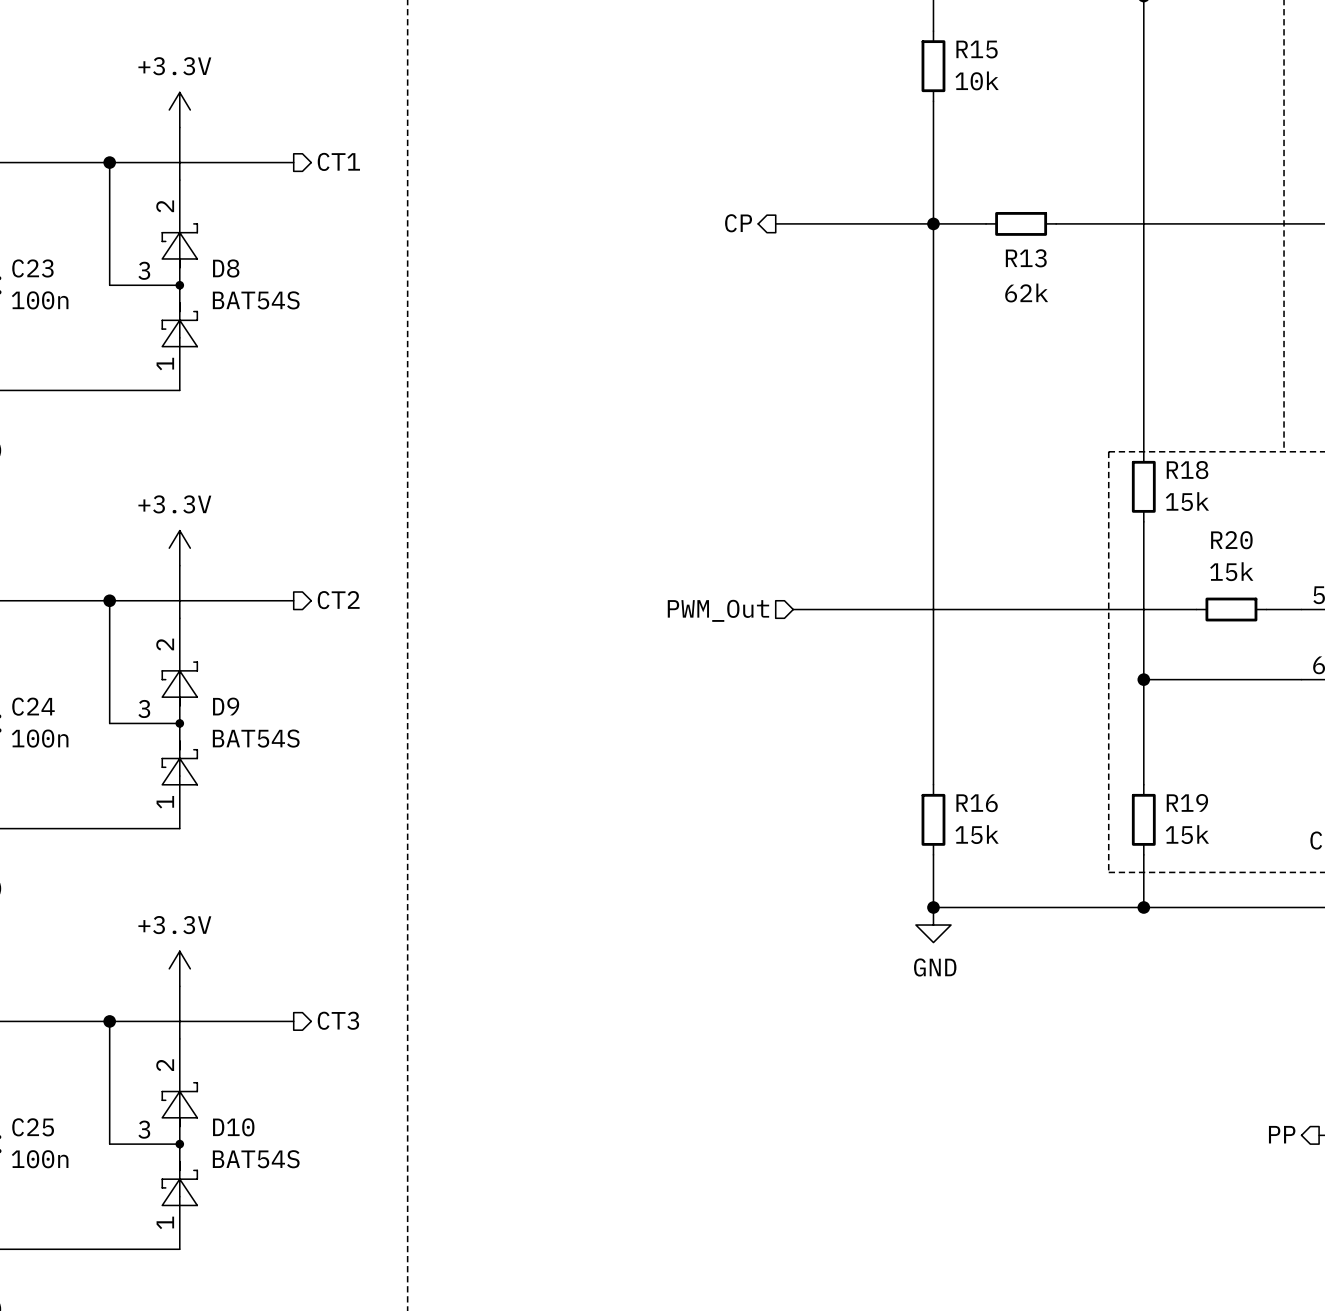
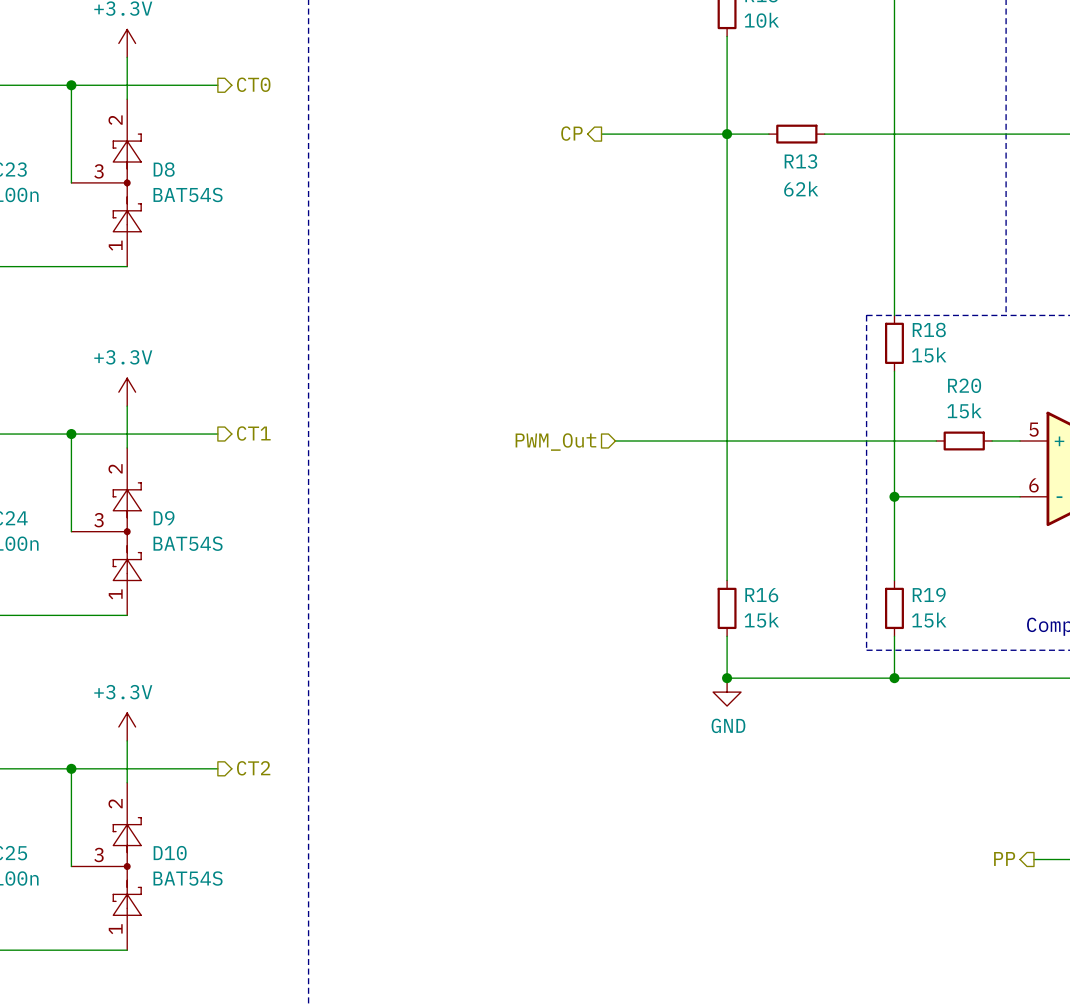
hierarchical label: CT1 (338, 161) -> CT0 (253, 84)
hierarchical label: CT2 (338, 600) -> CT1 (253, 433)
hierarchical label: CT3 (338, 1020) -> CT2 (253, 768)

